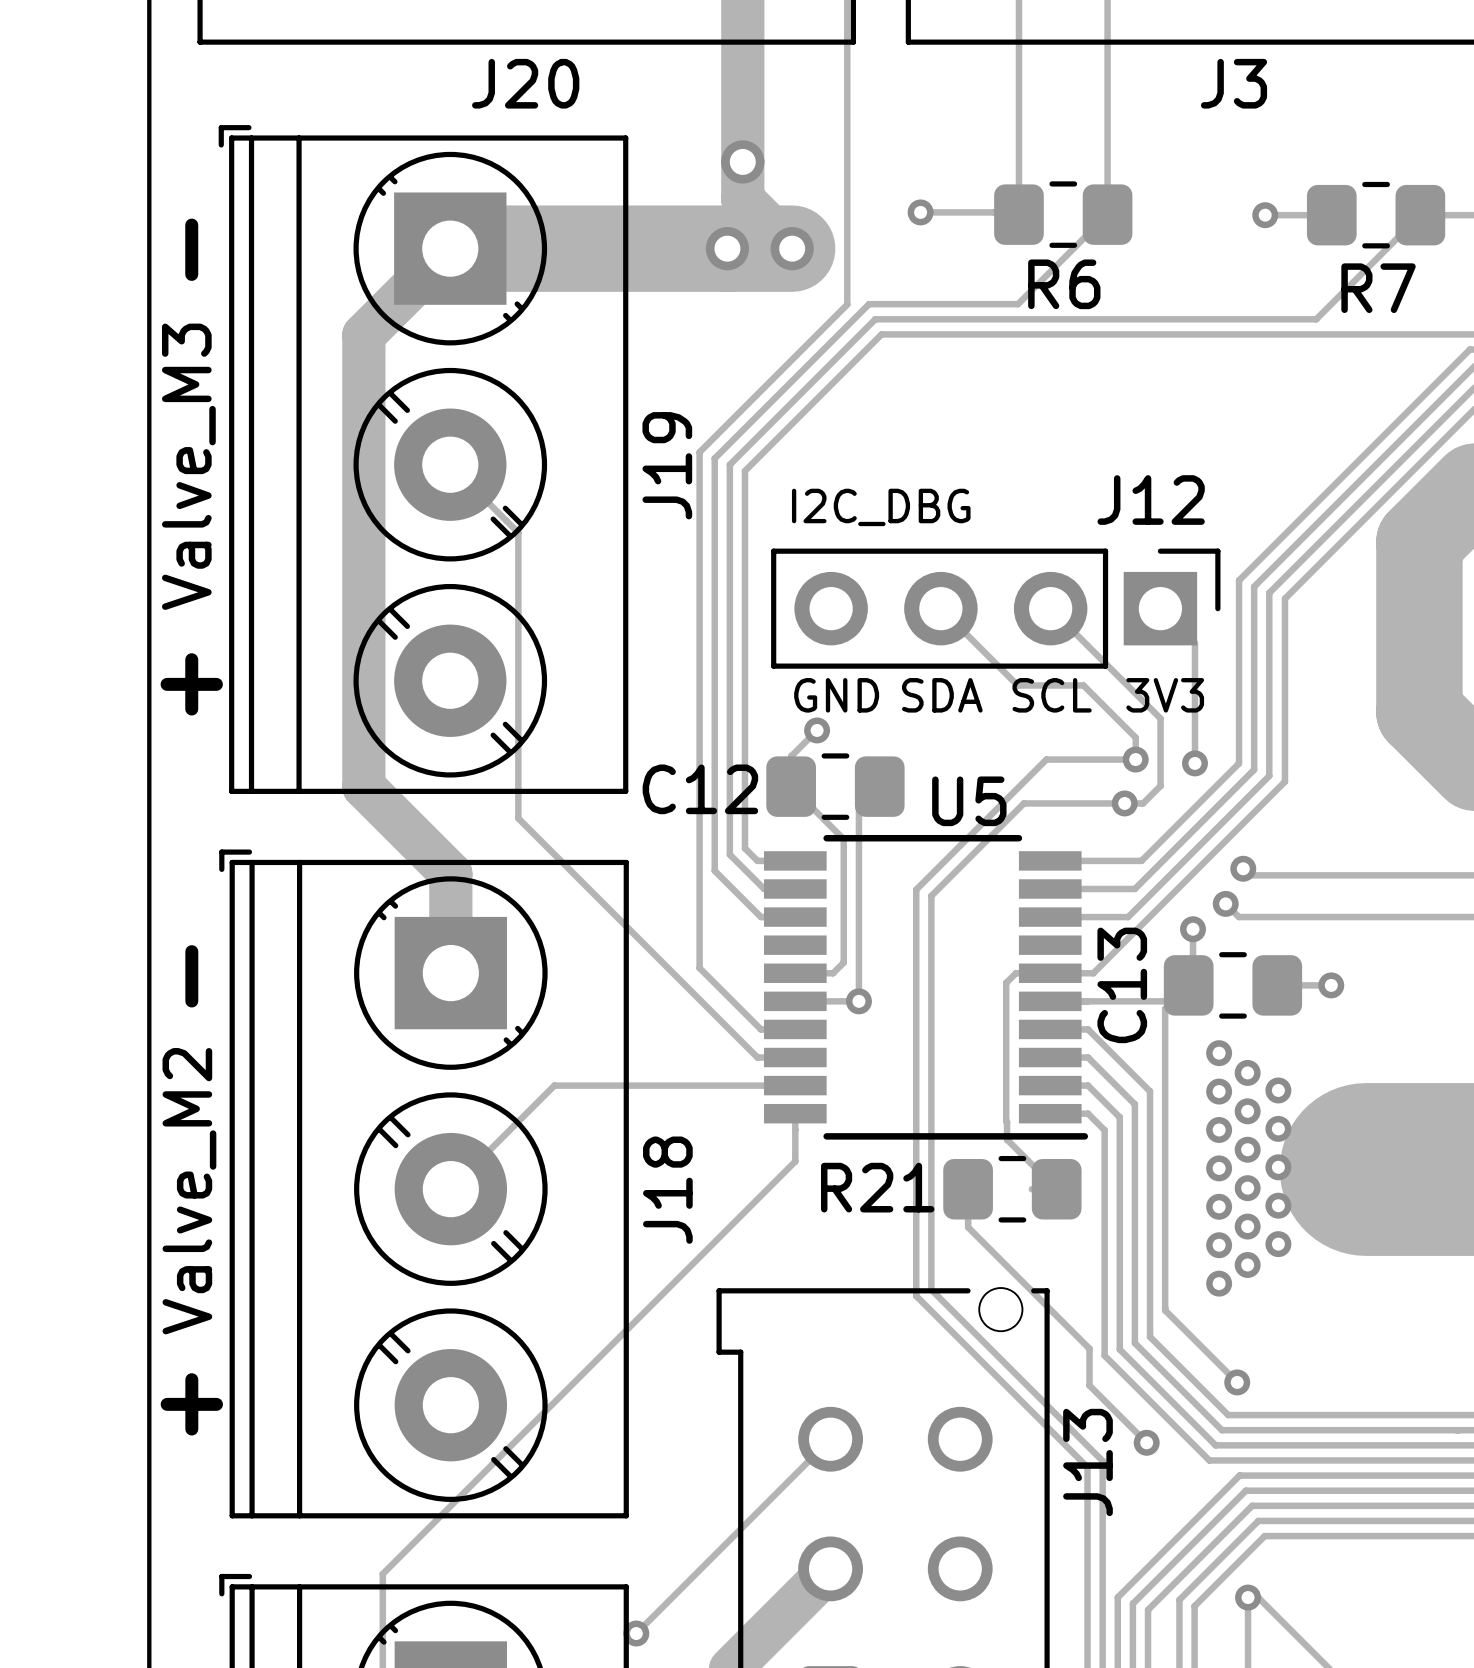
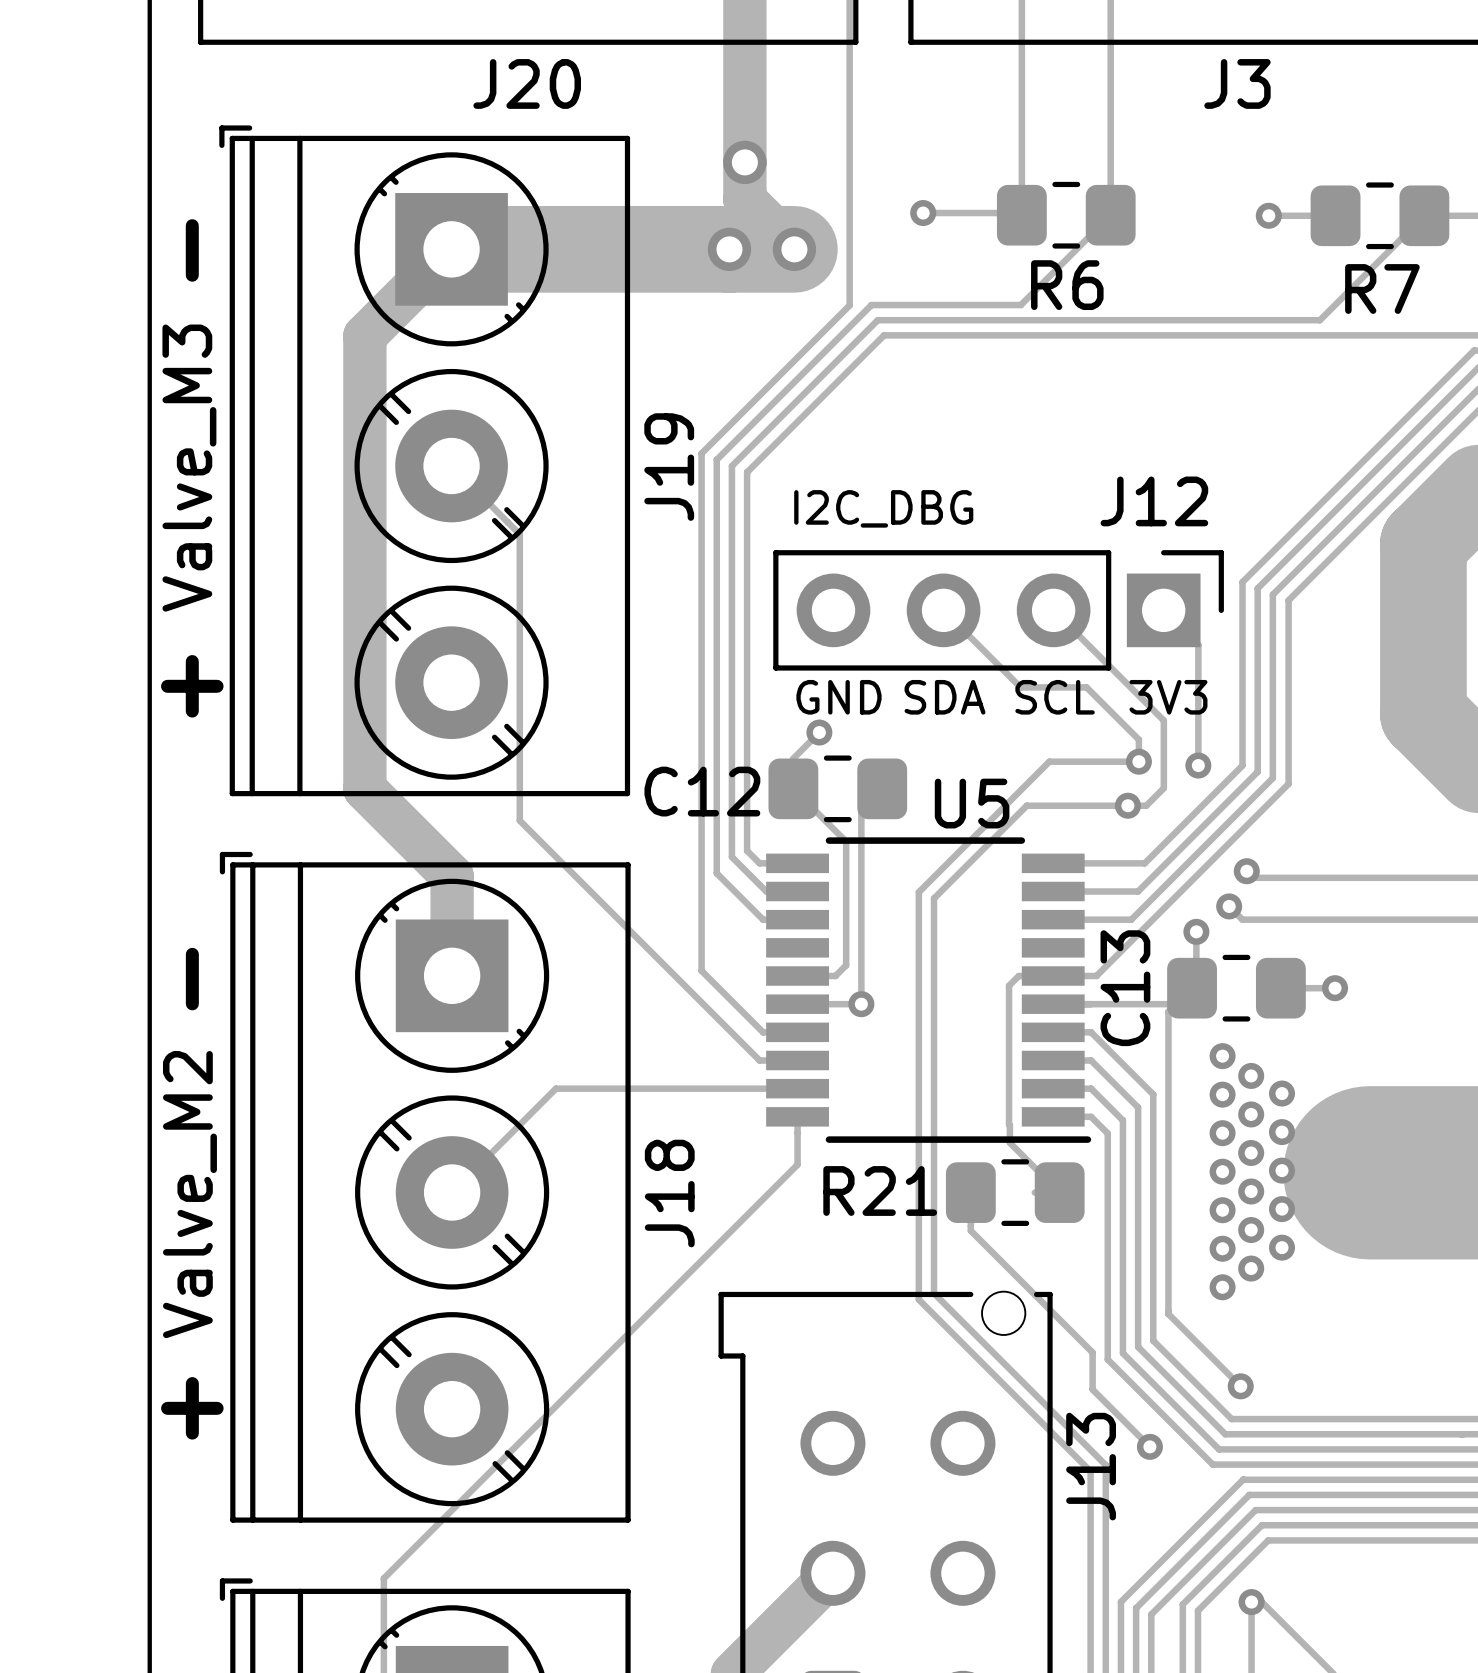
track: (830, 1439) (636, 1633) -> none
via: (636, 1633) -> none

